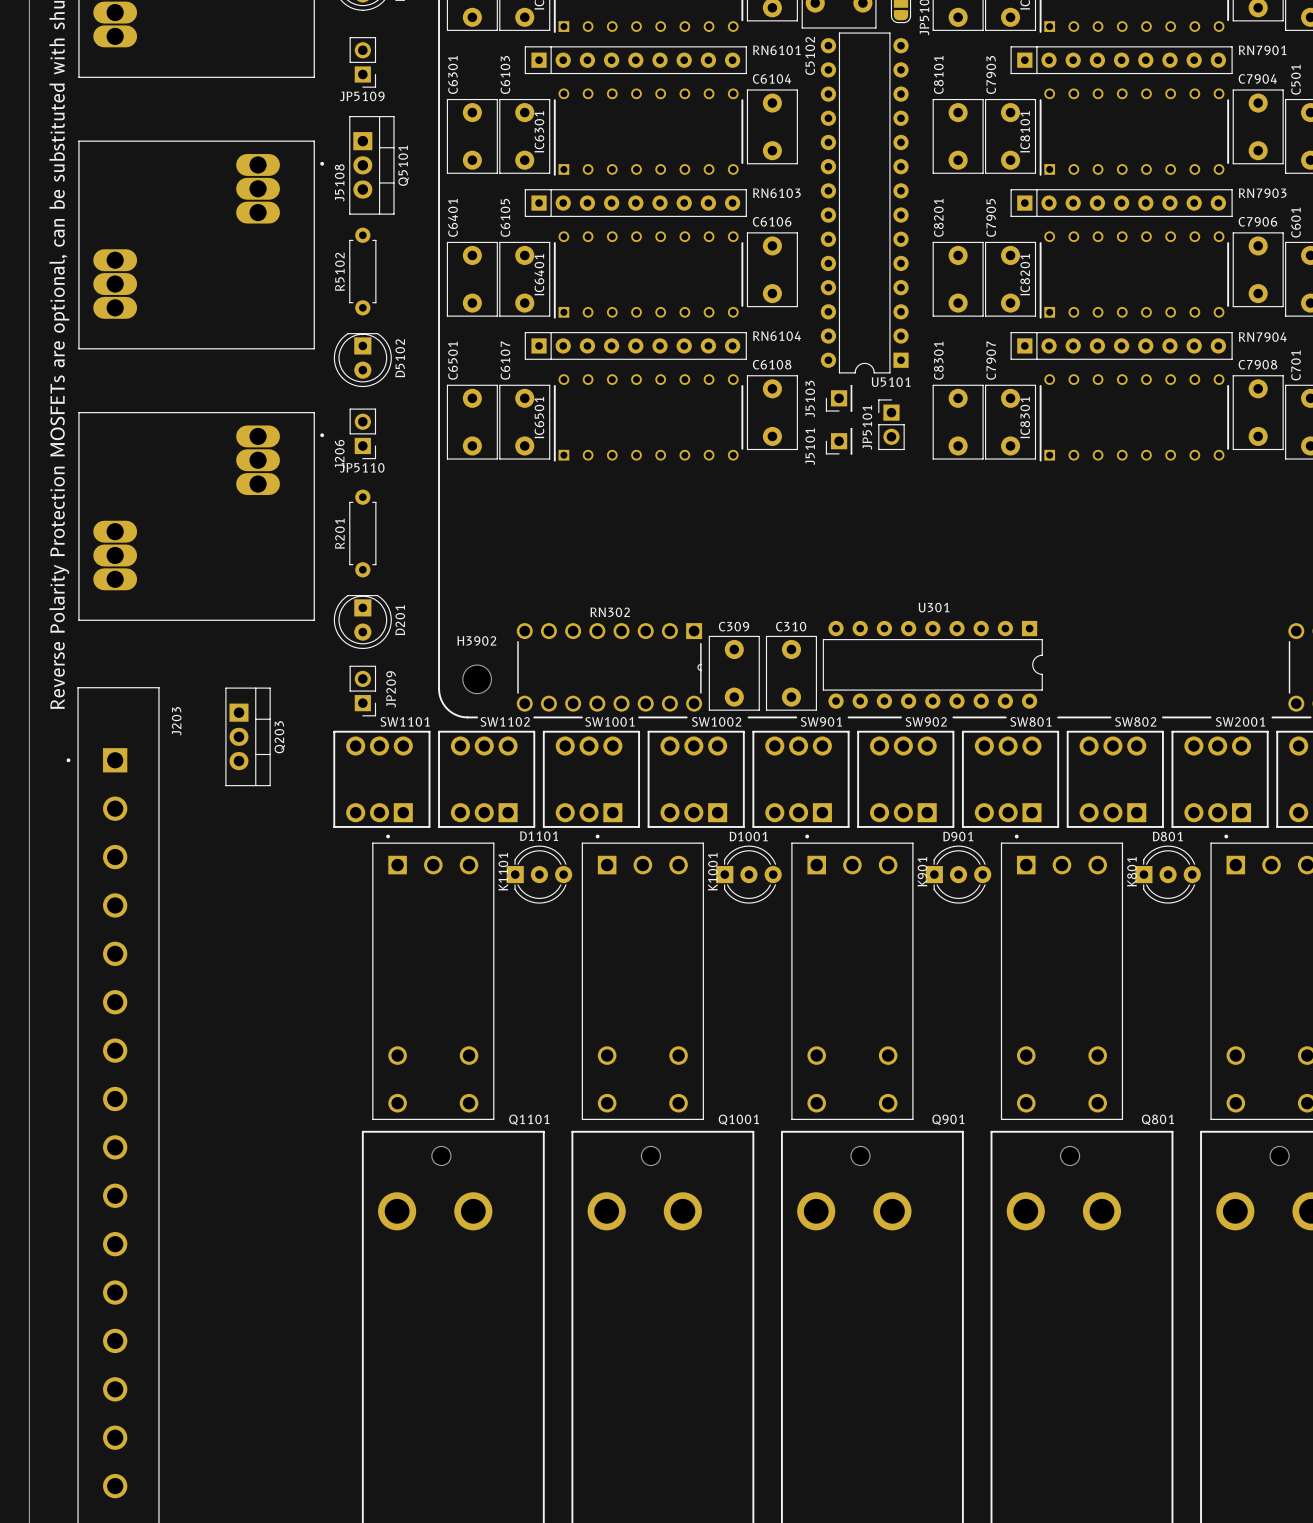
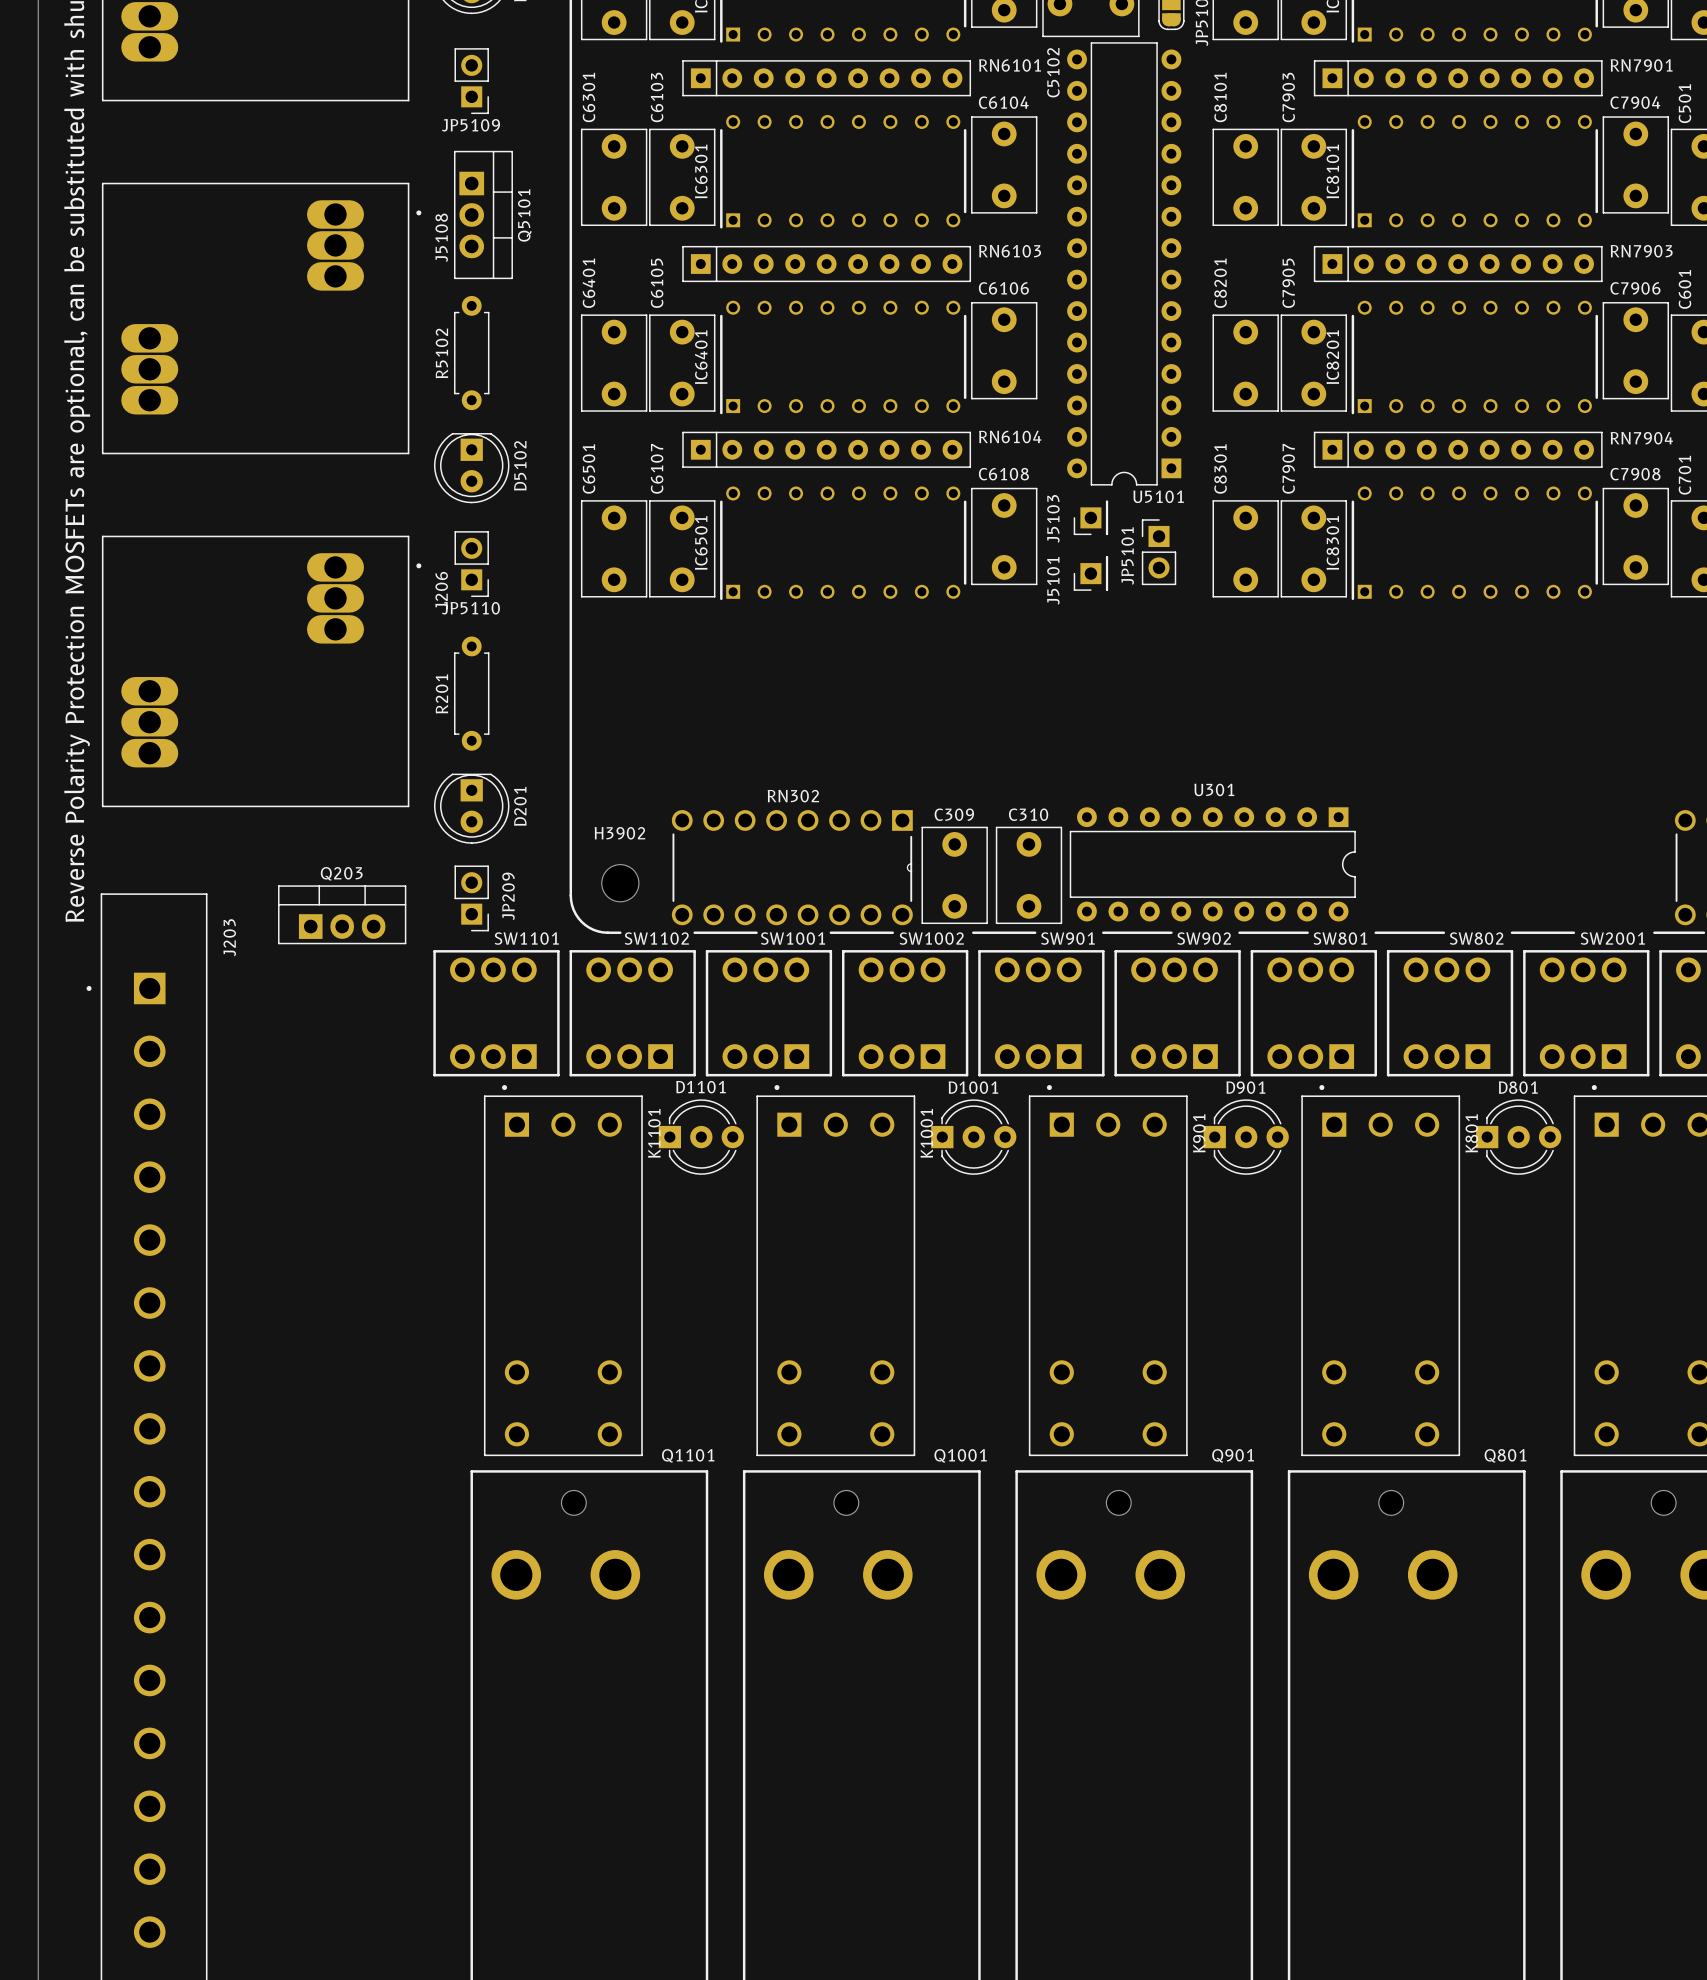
Q203 rotation: 0° (248, 736) -> 90° counterclockwise (342, 914)

